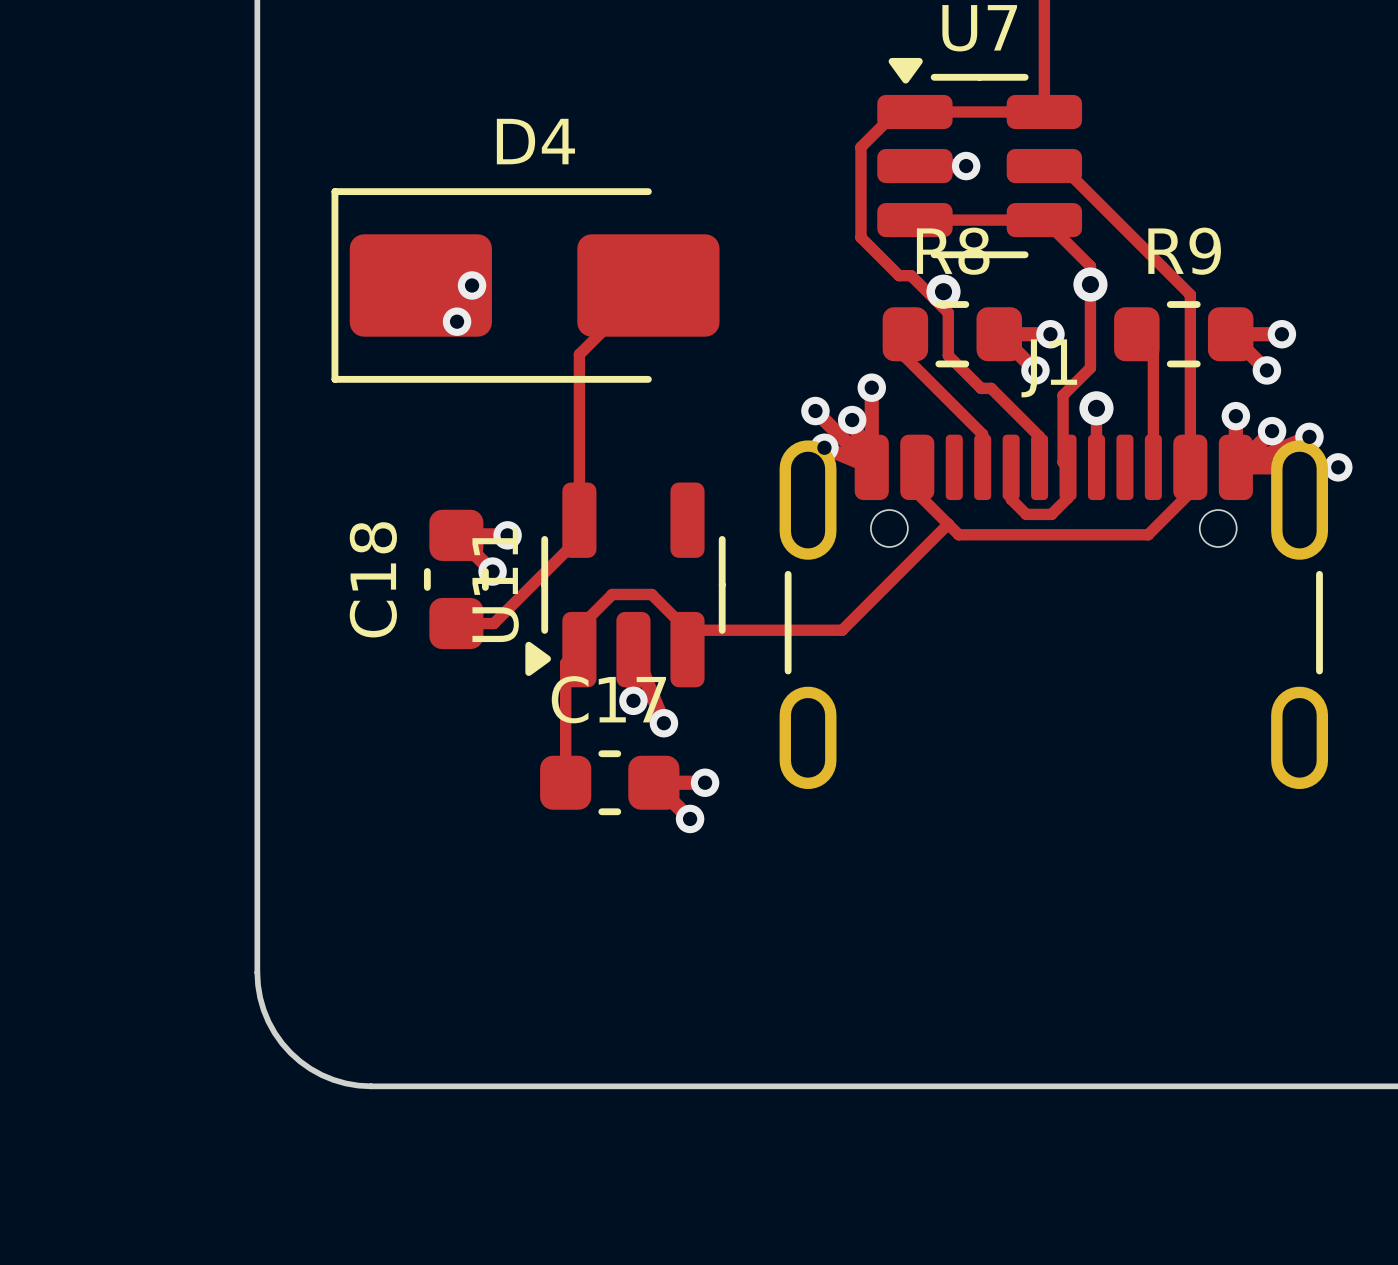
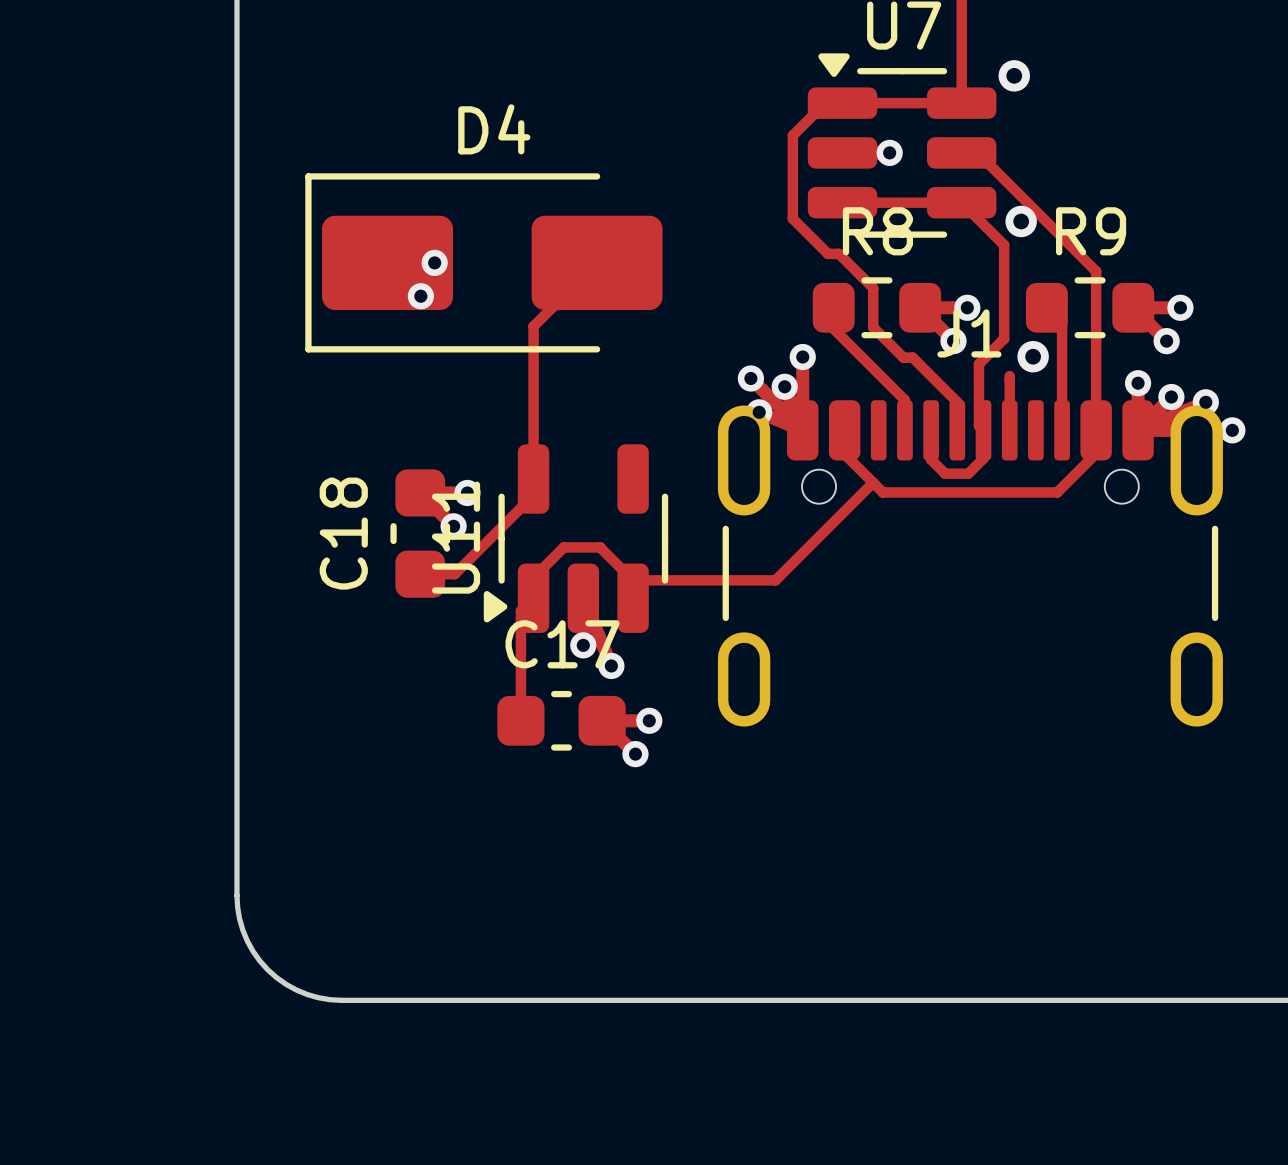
via: none -> (1014, 75)
via position: (1090, 284) -> (1021, 221)
via: (943, 291) -> none
via position: (1096, 408) -> (1033, 356)

